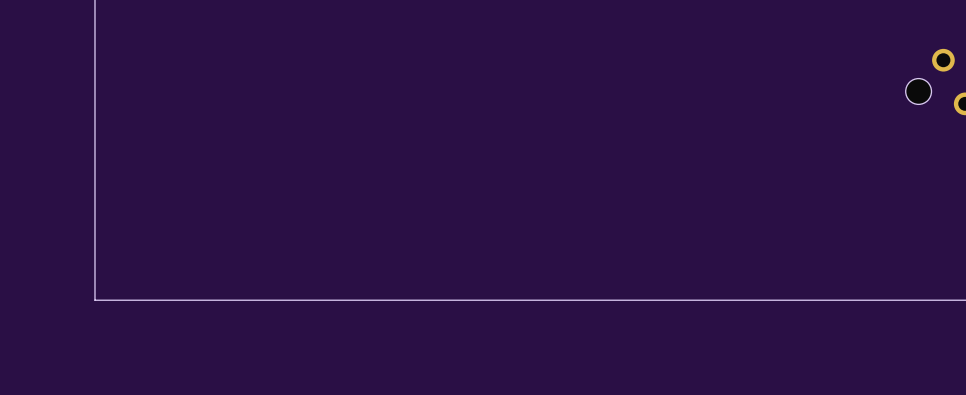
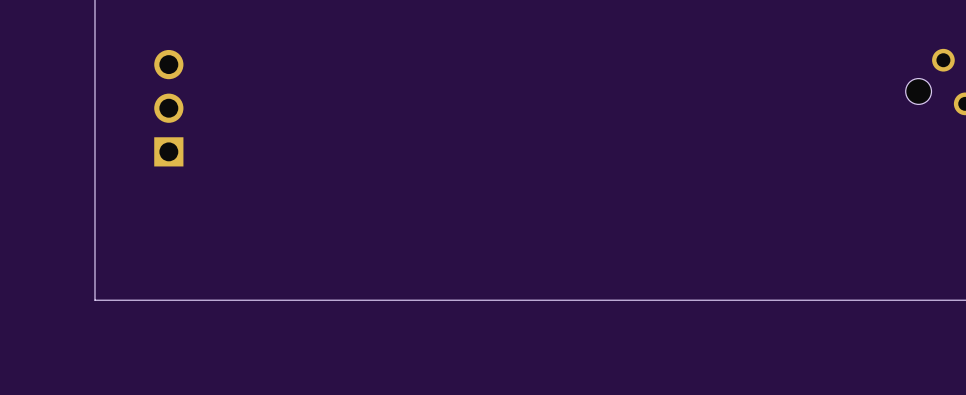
part: none -> (168, 108)

